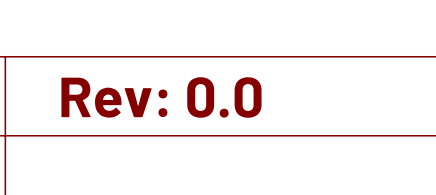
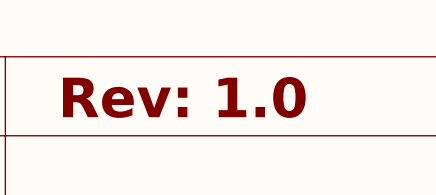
title block: Rev: 0.0 (161, 97) -> Rev: 1.0 (184, 97)

